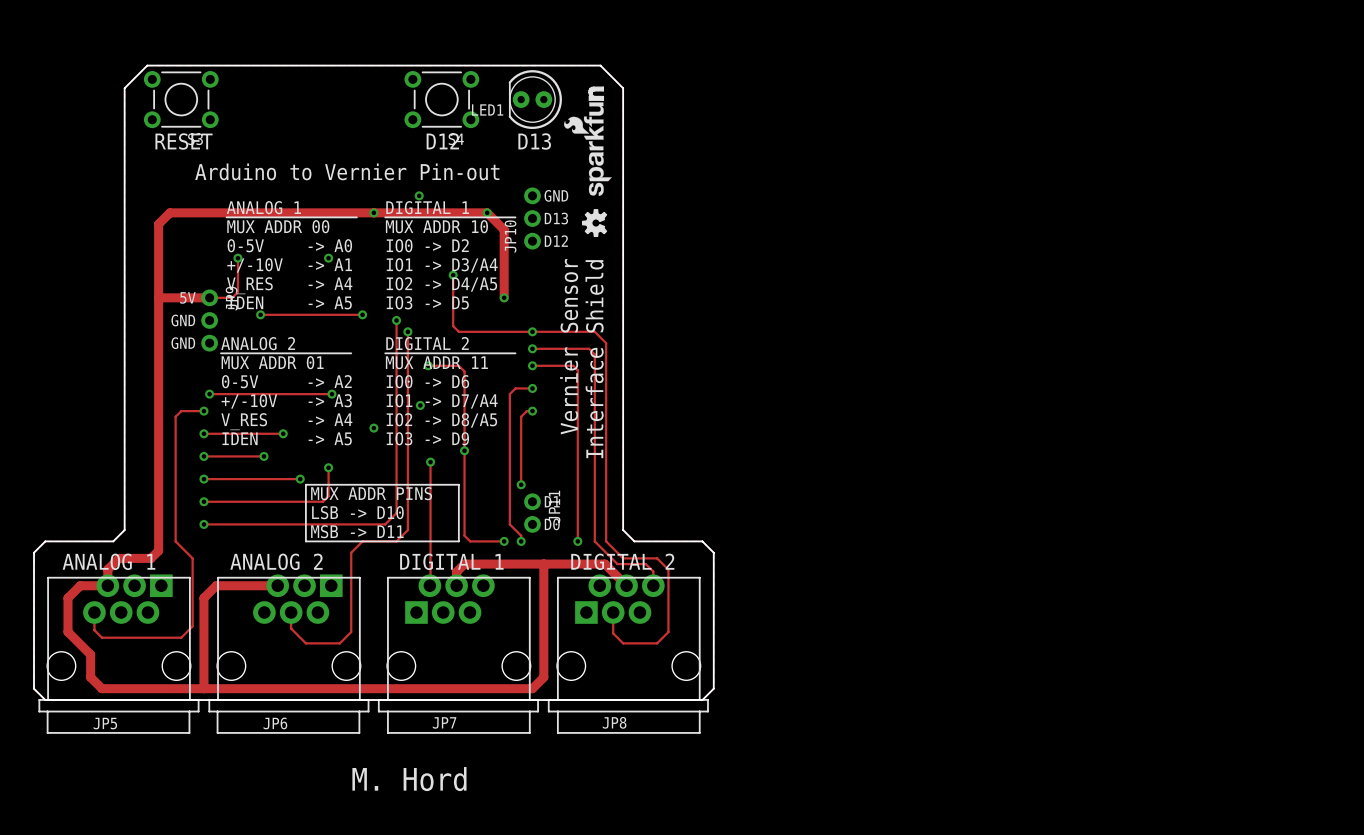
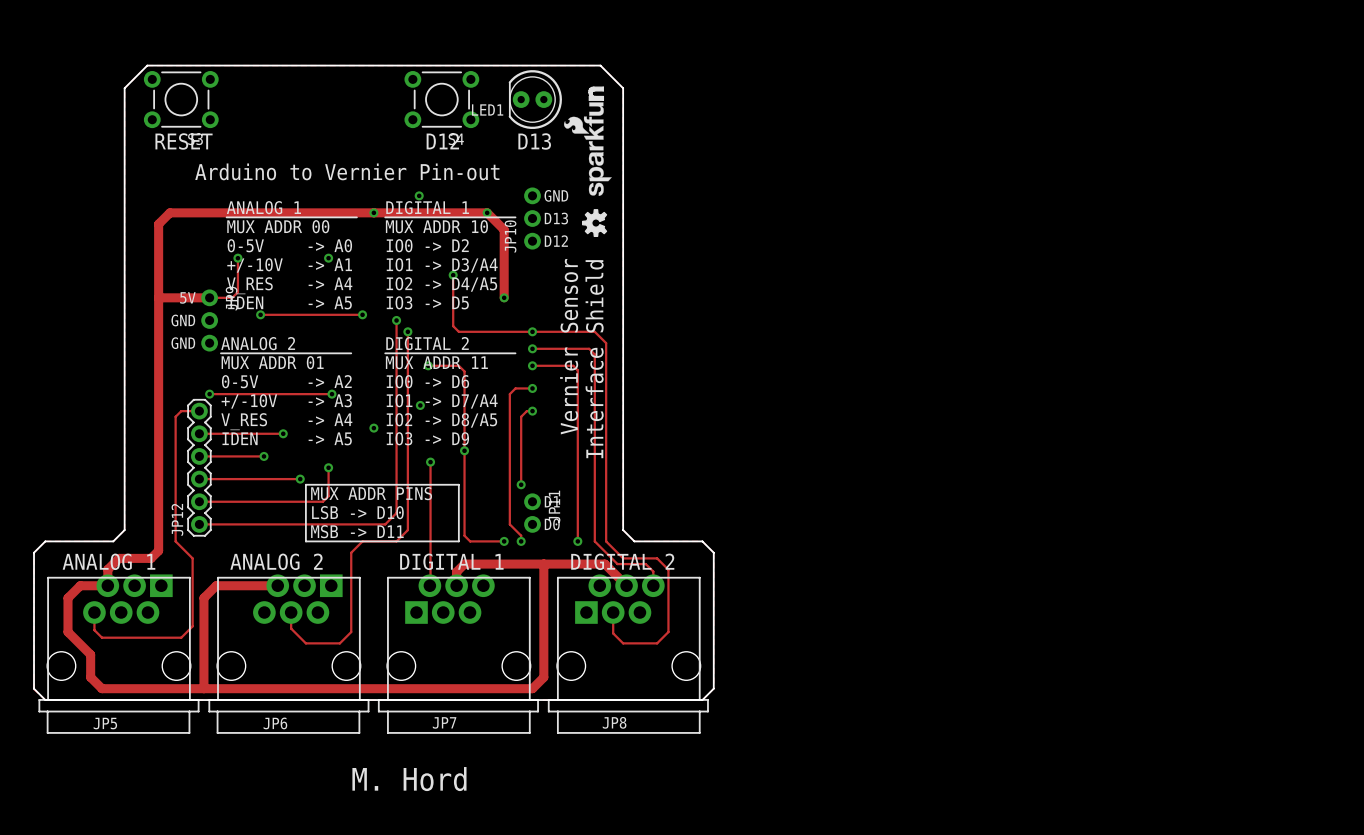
via: (203, 411) -> none
via: (203, 433) -> none
via: (203, 456) -> none
JP12: none -> (199, 467)
via: (203, 479) -> none
via: (203, 501) -> none
via: (203, 524) -> none

